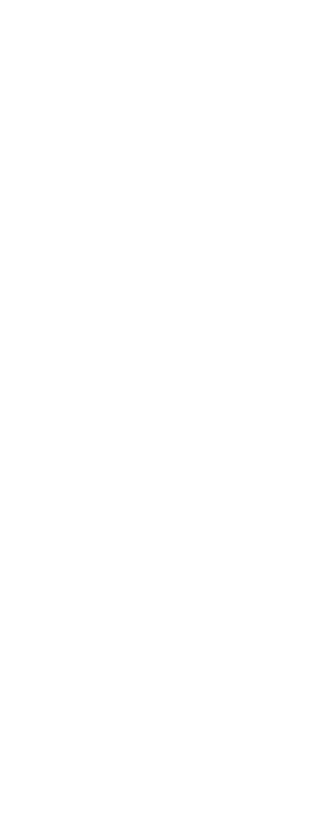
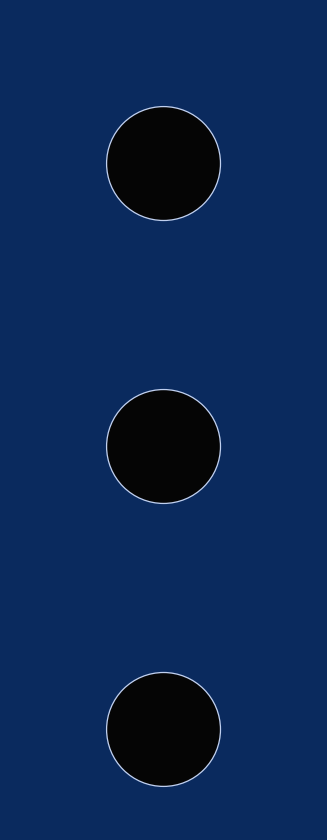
part: none -> (163, 163)
part: none -> (163, 446)
part: none -> (163, 729)

